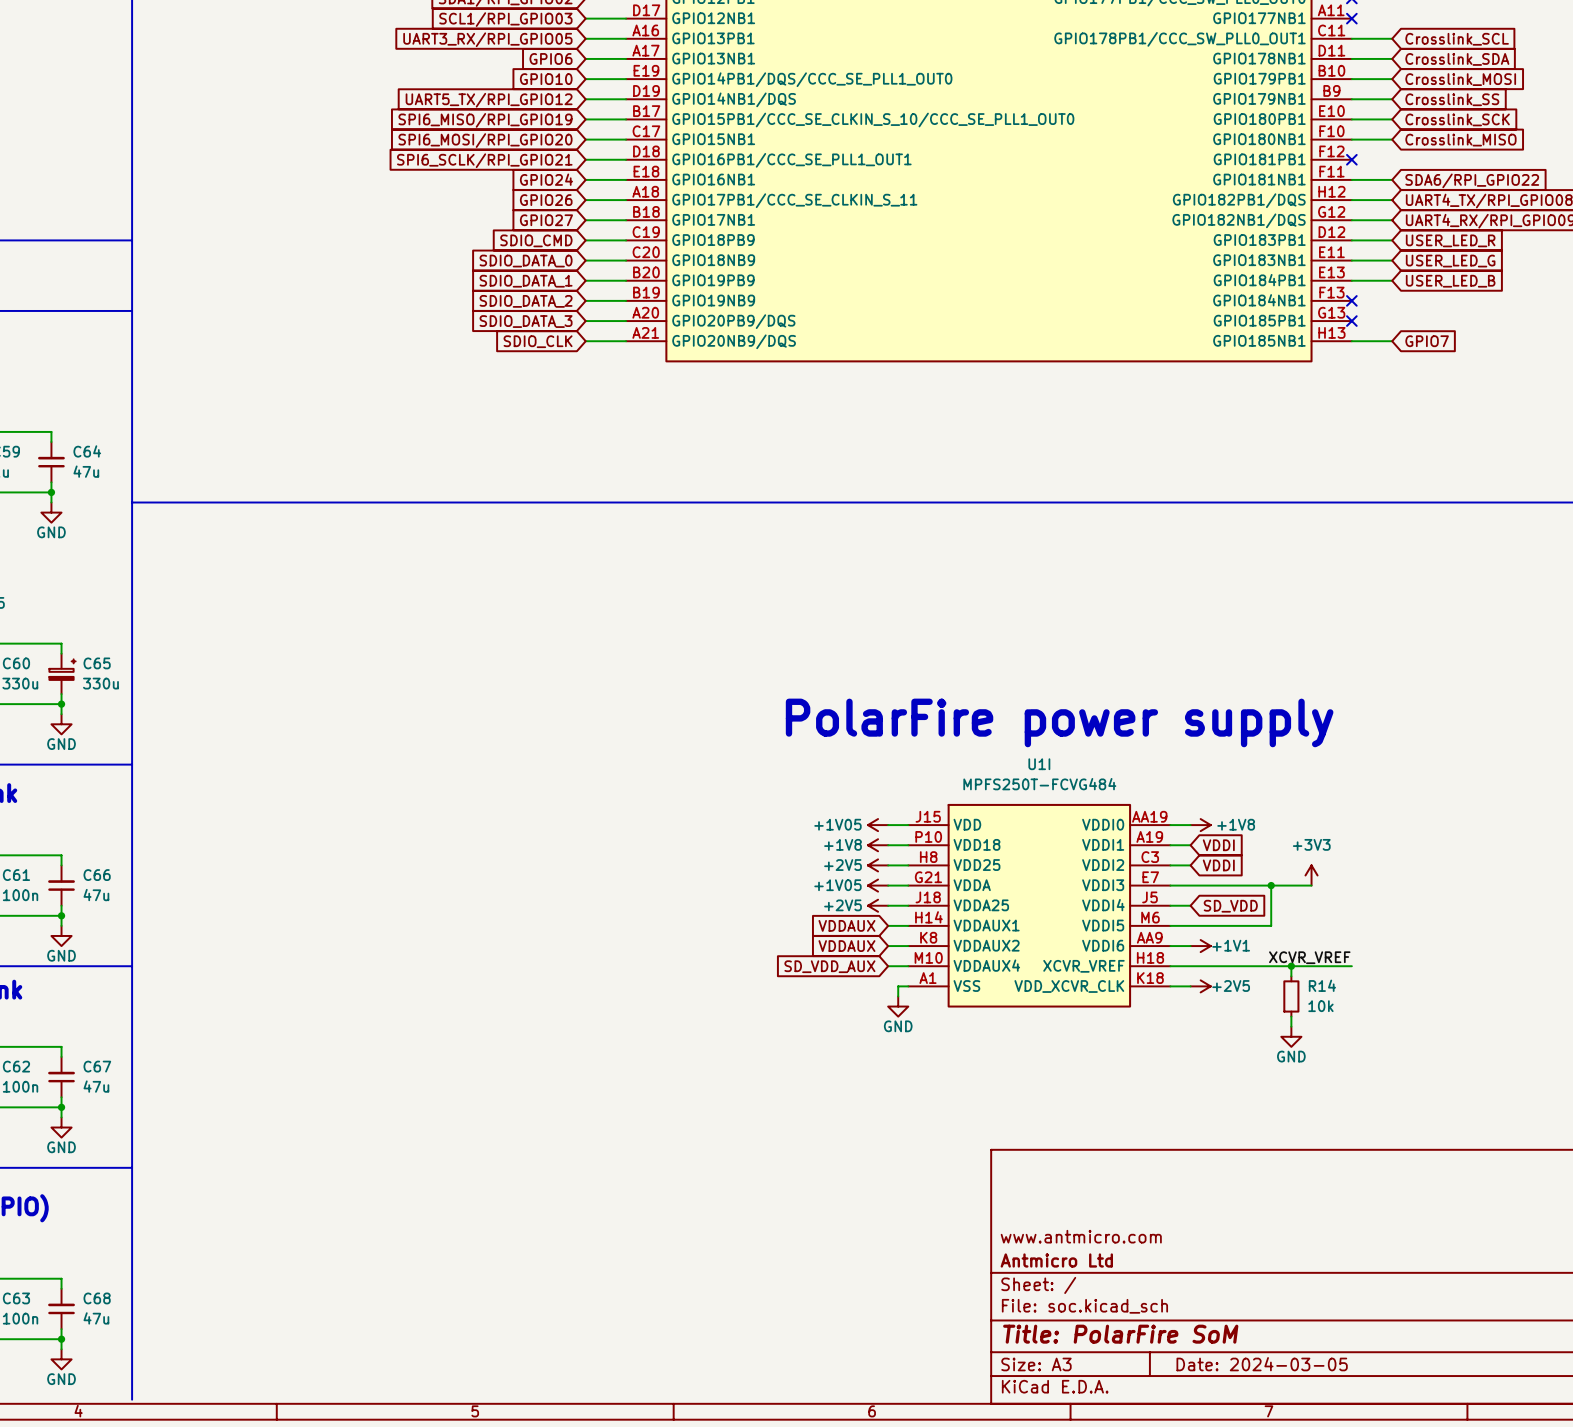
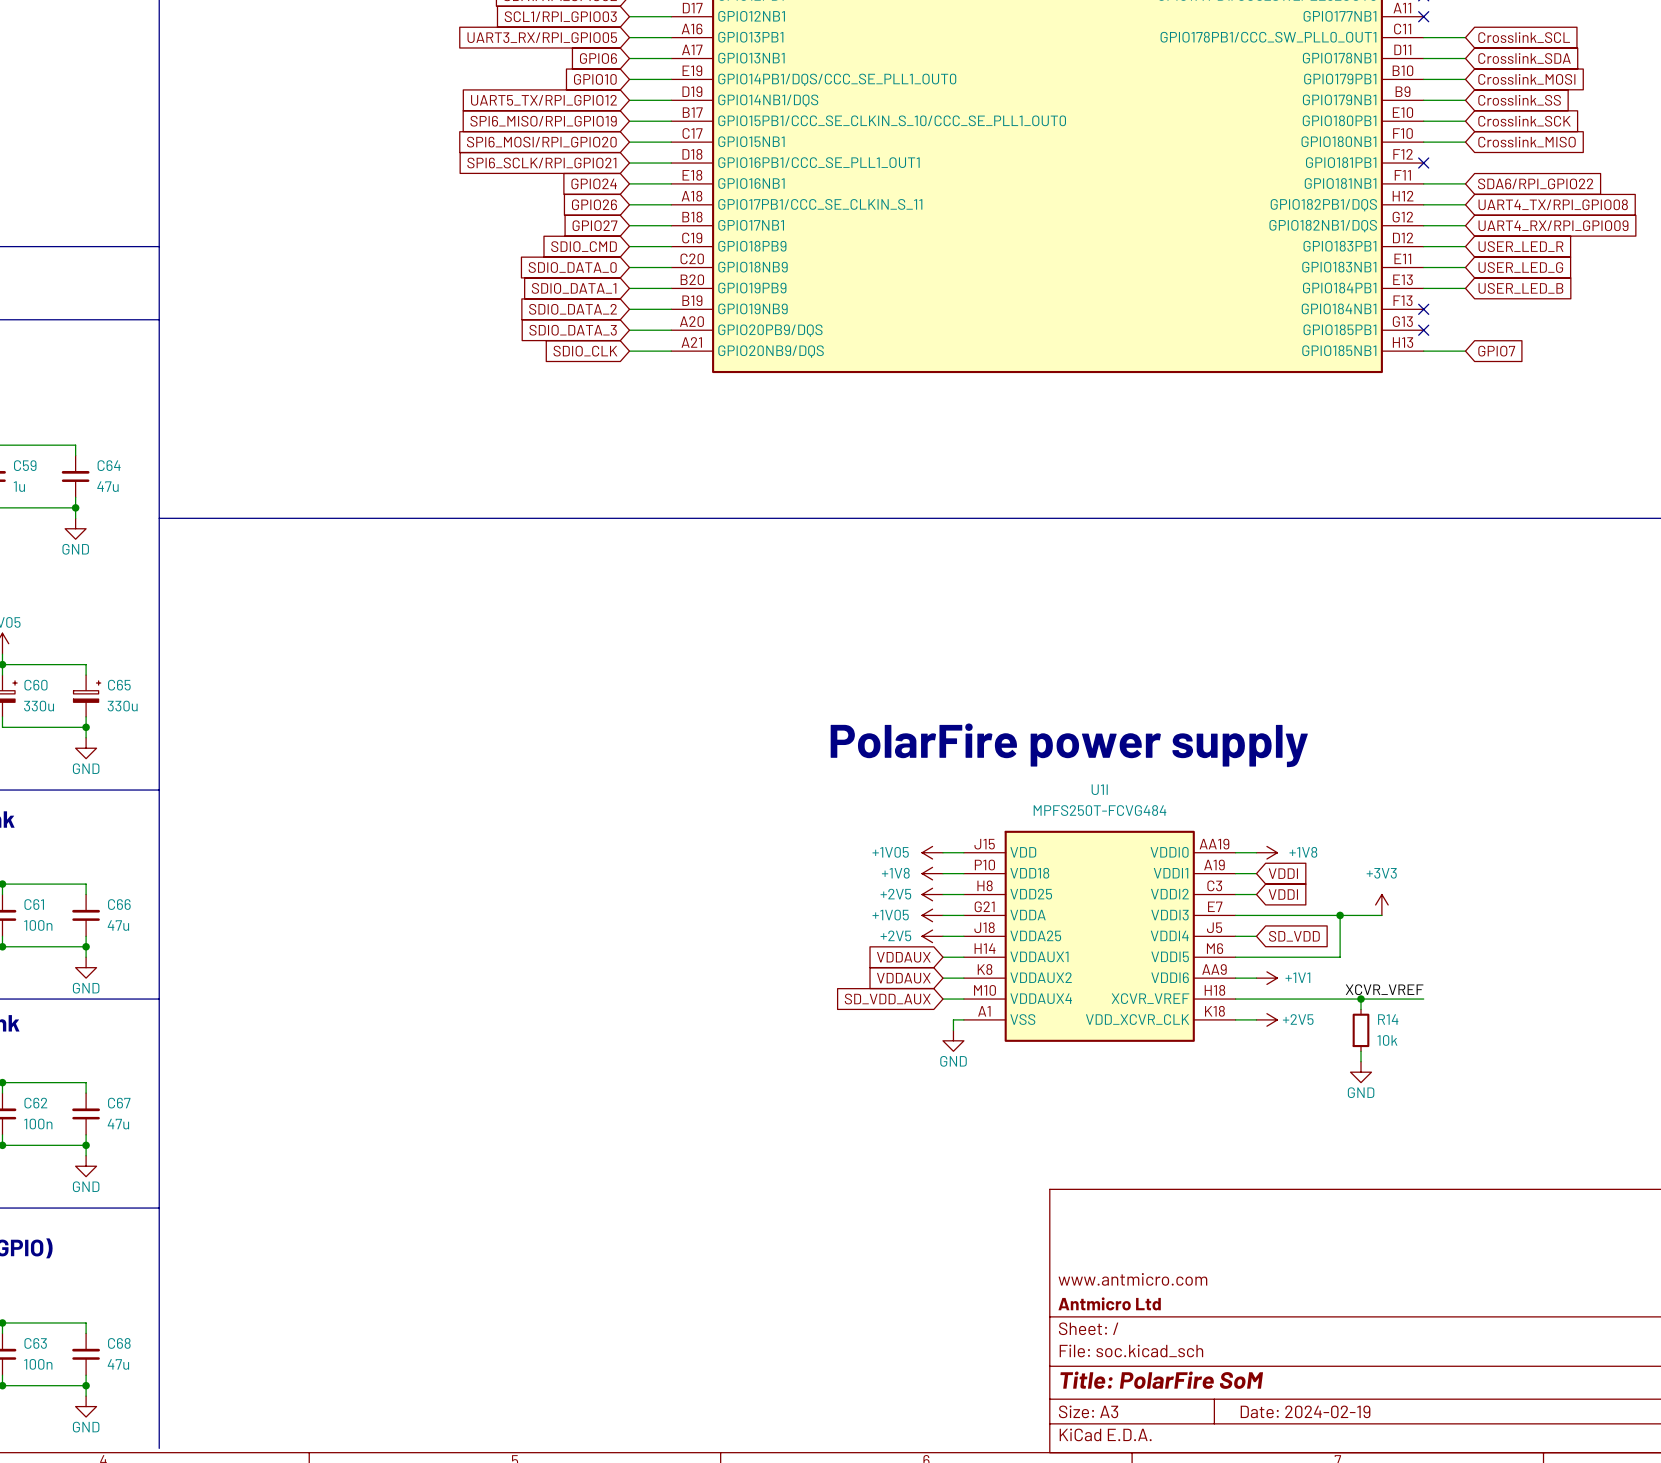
title block: Date: 2024-03-05 (1262, 1364) -> Date: 2024-02-19 (1305, 1411)

